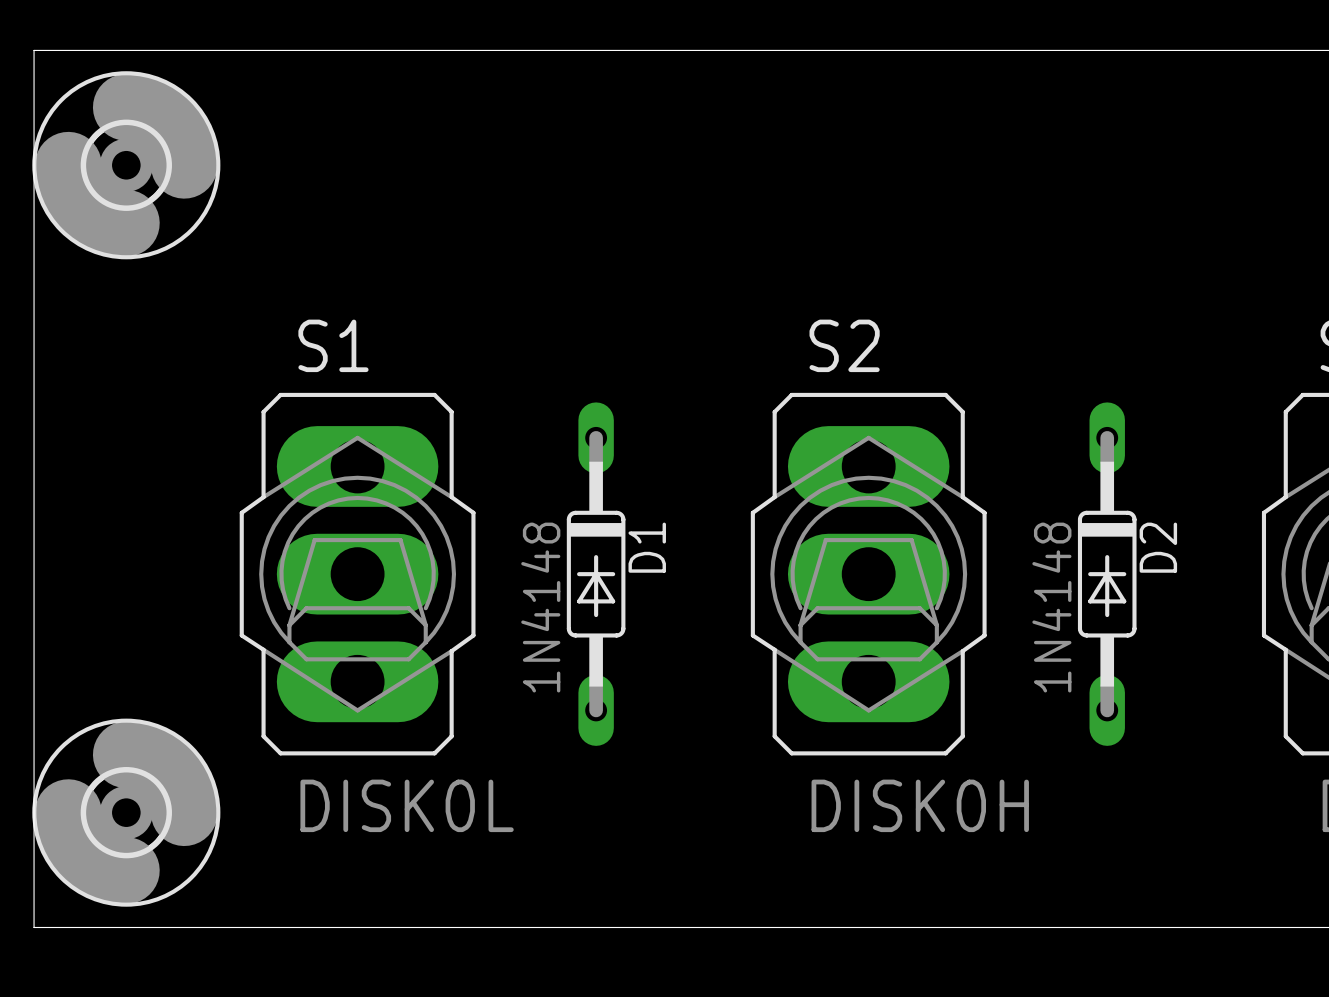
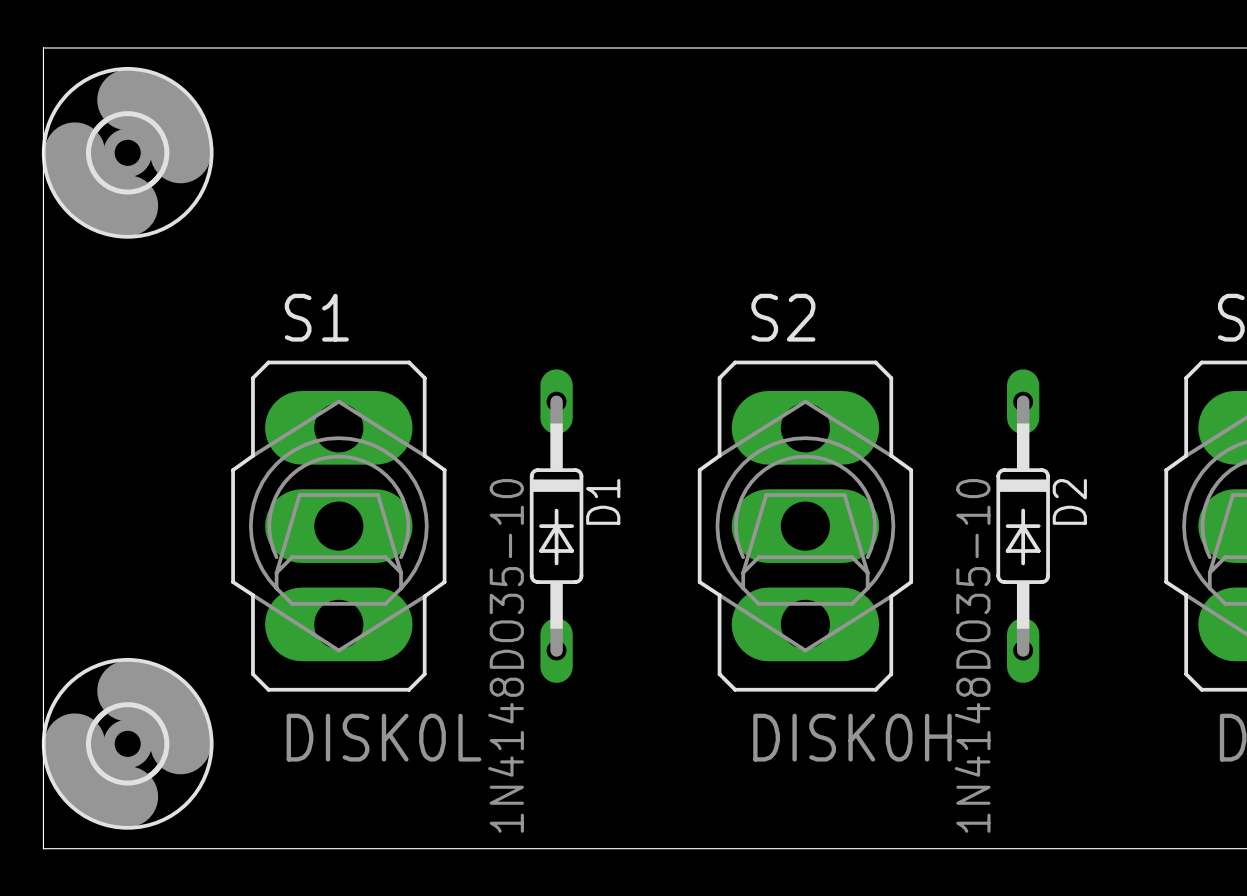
D1 value: 1N4148 (540, 607) -> 1N4148DO35-10 (506, 655)
D2 value: 1N4148 (1051, 607) -> 1N4148DO35-10 (972, 655)

